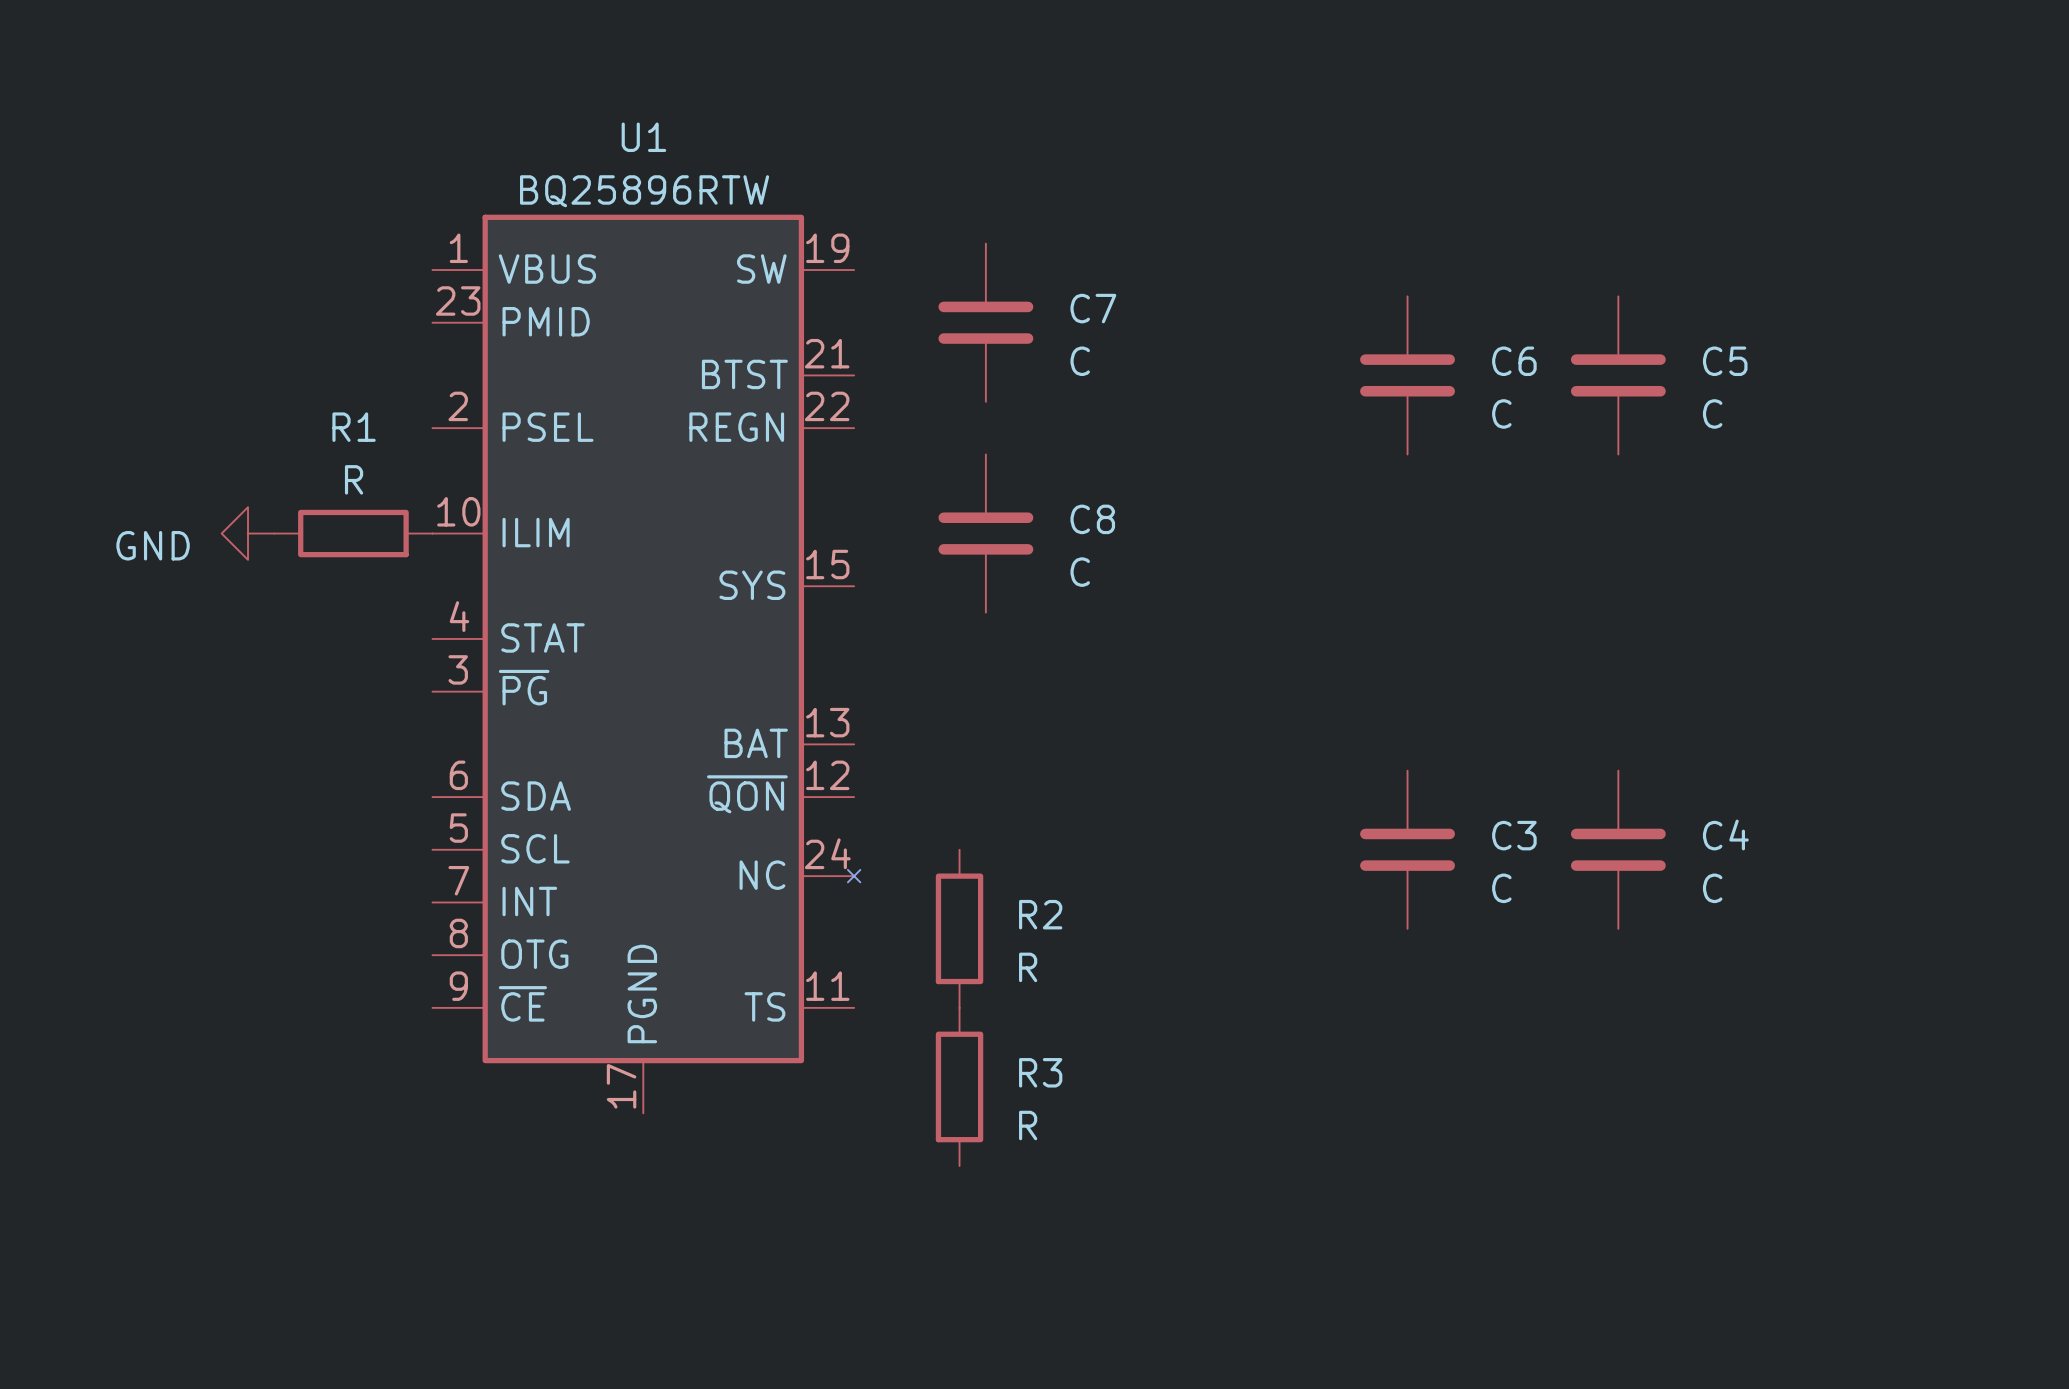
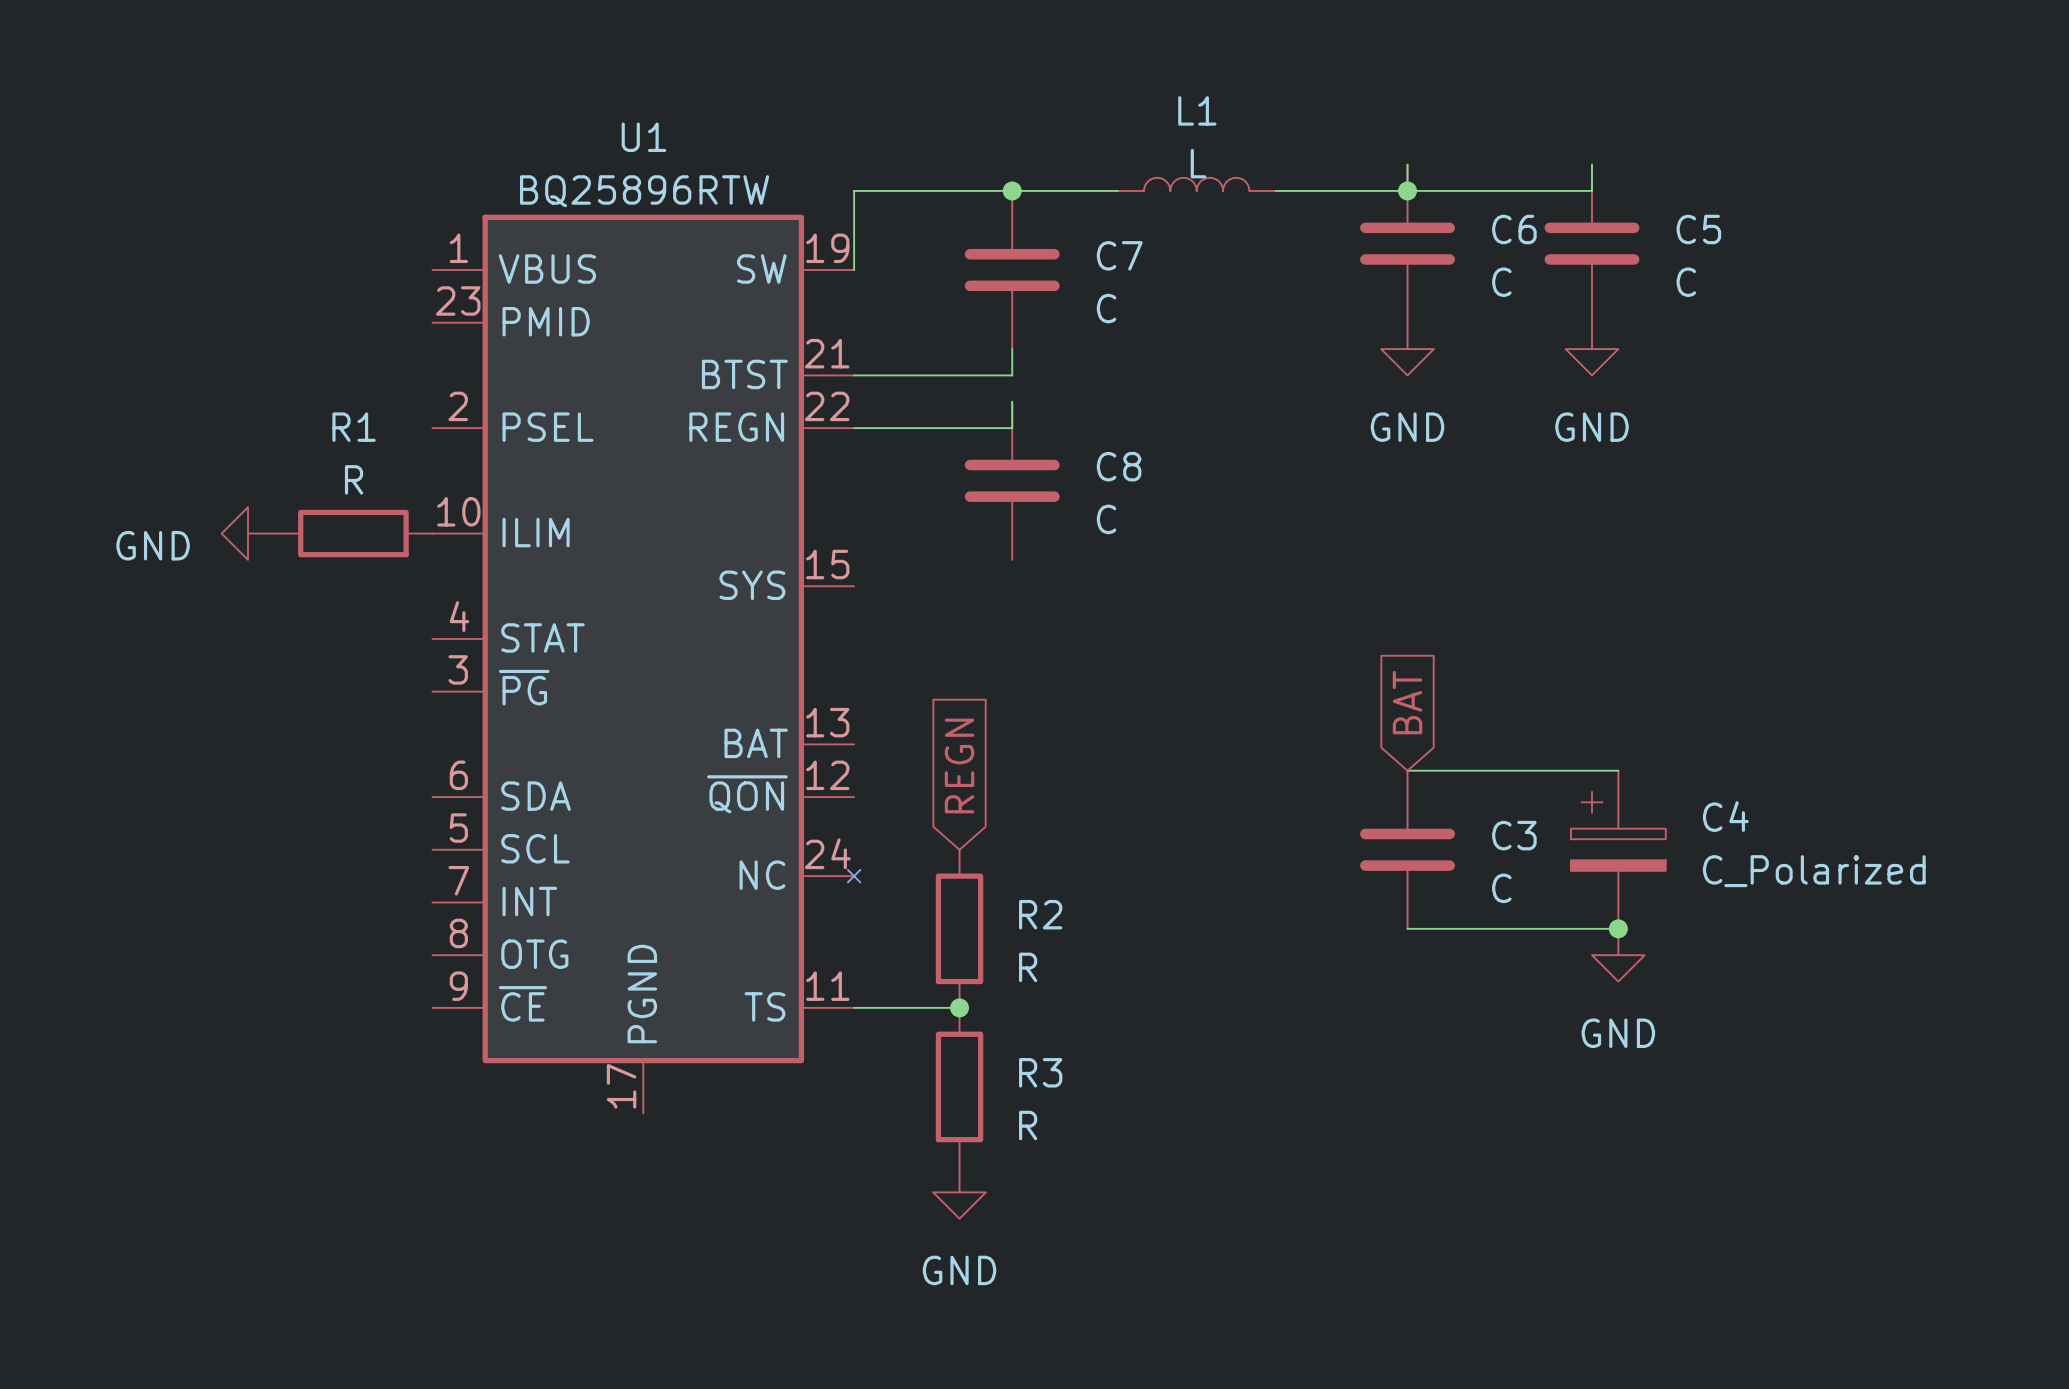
wire: none -> (1407, 164) (1407, 190)
wire: none -> (1592, 164) (1592, 190) (1275, 190)
L1: none -> L (1196, 184)
junction: none -> (1012, 190)
wire: none -> (1117, 190) (854, 190) (854, 270)
junction: none -> (1407, 190)
C7 position: (985, 322) -> (1012, 270)
wire: none -> (1012, 349) (1012, 375) (854, 375)
power symbol: none -> GND (1407, 349)
power symbol: none -> GND (1592, 349)
C6 position: (1407, 375) -> (1407, 243)
C5 position: (1618, 375) -> (1592, 243)
wire: none -> (1012, 401) (1012, 428) (854, 428)
C8 position: (985, 533) -> (1012, 480)
global label: none -> BAT (1407, 702)
global label: none -> REGN (959, 765)
wire: none -> (1407, 770) (1618, 770)
C4 symbol: [1570, 770, 1666, 929] -> [1570, 770, 1666, 929]
C4 value: C (1712, 888) -> C_Polarized (1814, 871)
wire: none -> (1407, 928) (1618, 928)
junction: none -> (1618, 928)
power symbol: none -> GND (1618, 955)
wire: none -> (854, 1007) (959, 1007)
junction: none -> (959, 1007)
power symbol: none -> GND (959, 1192)

